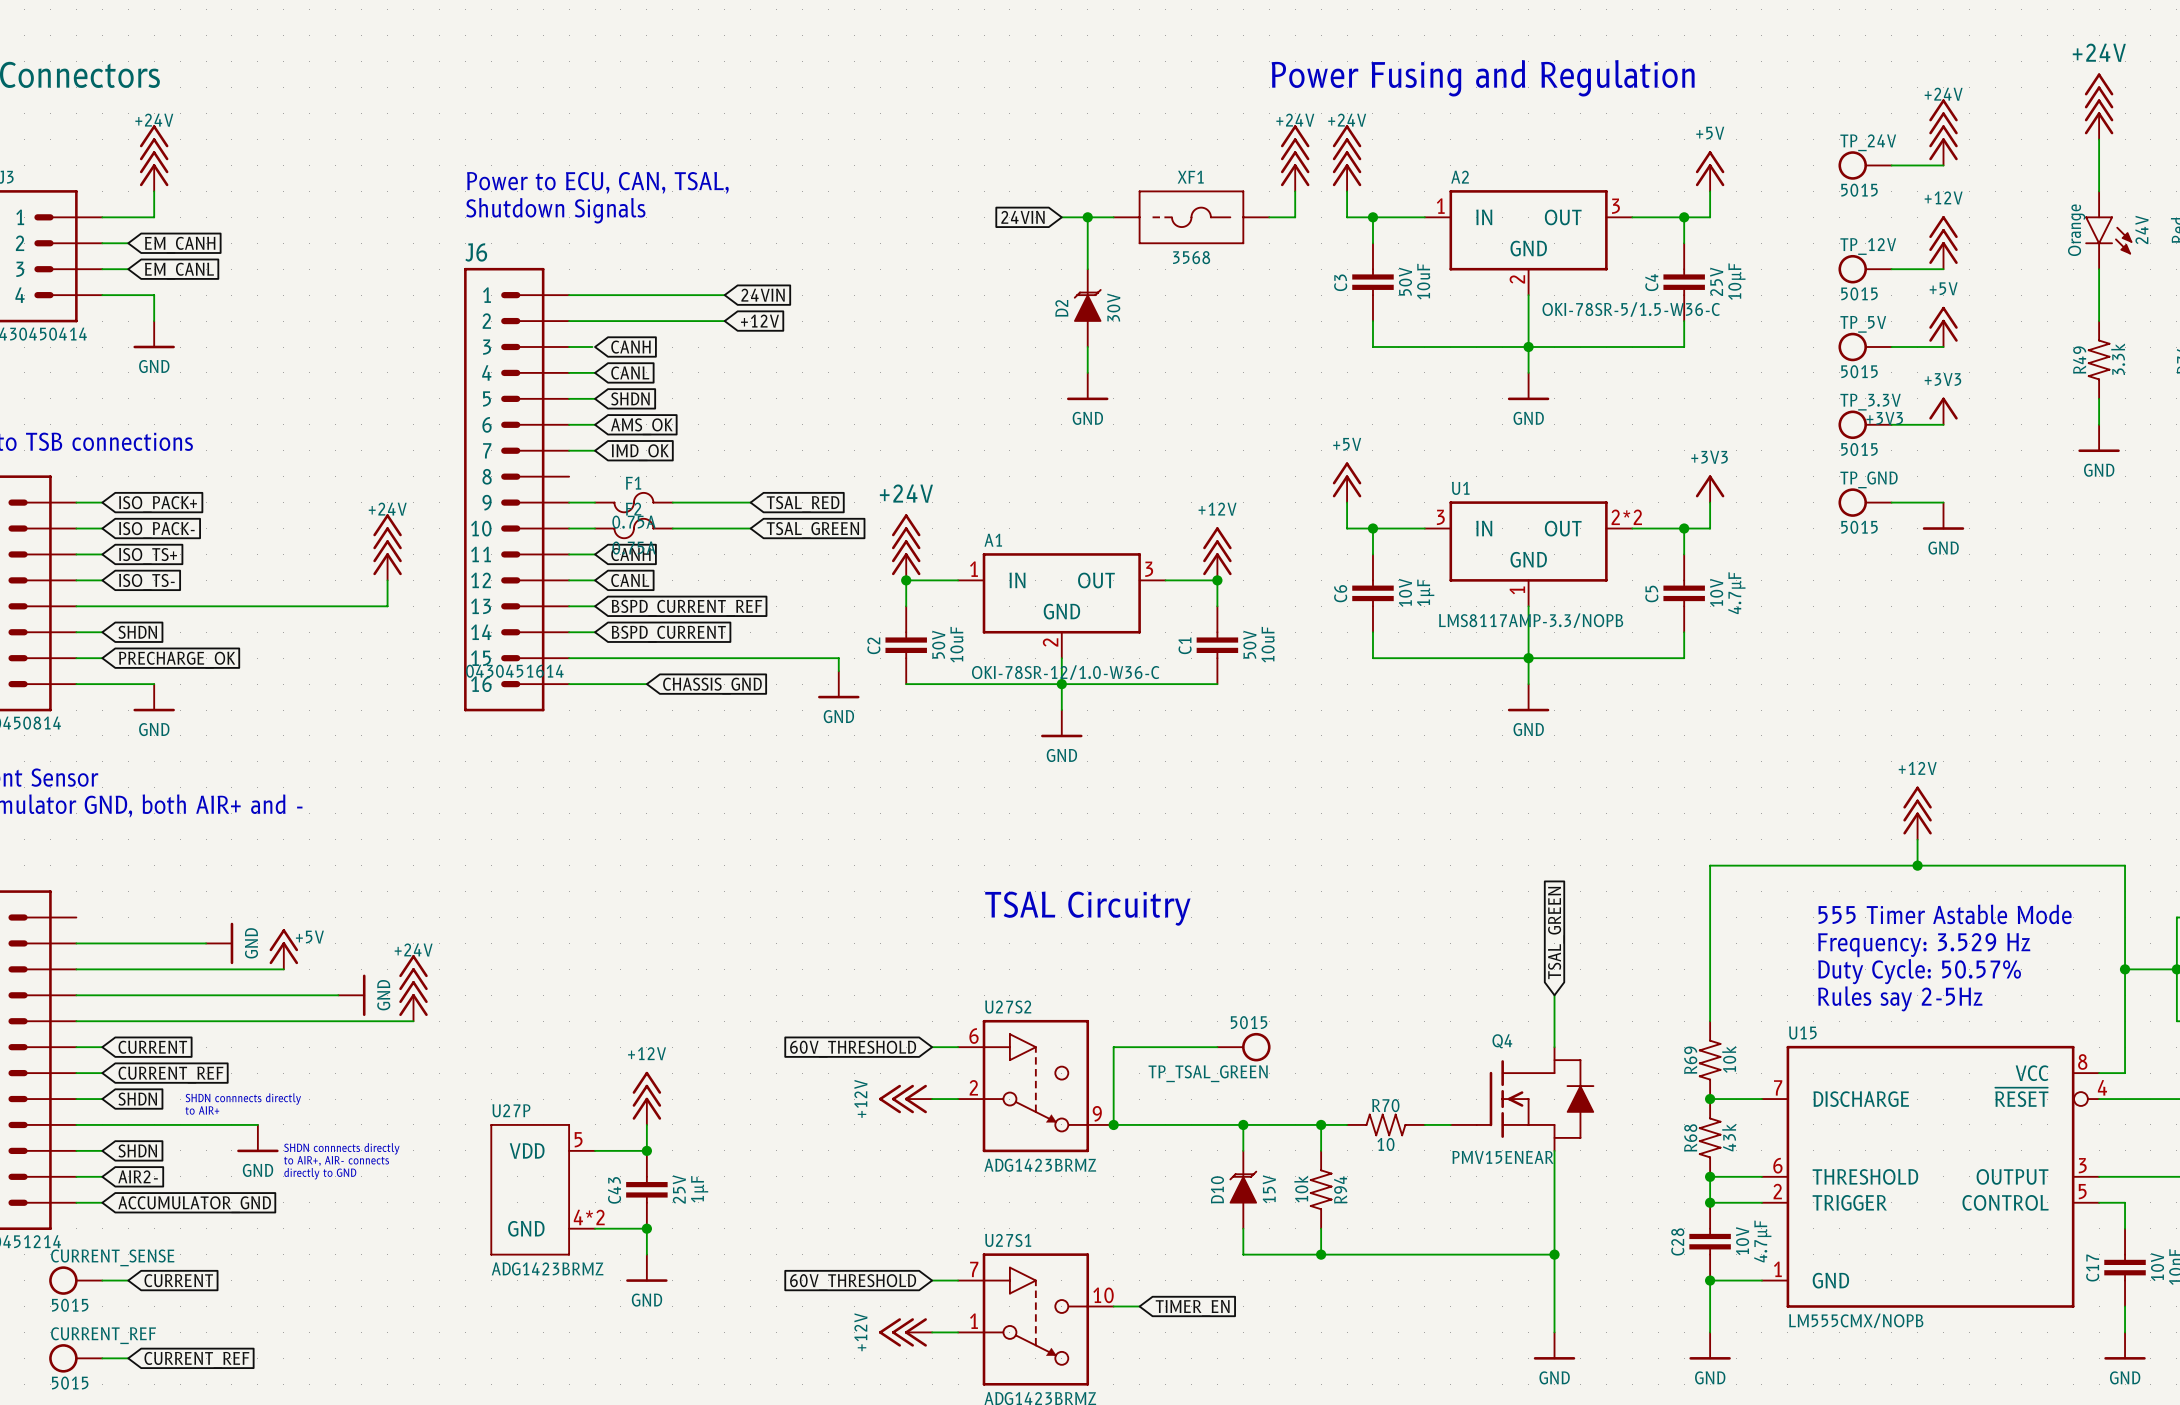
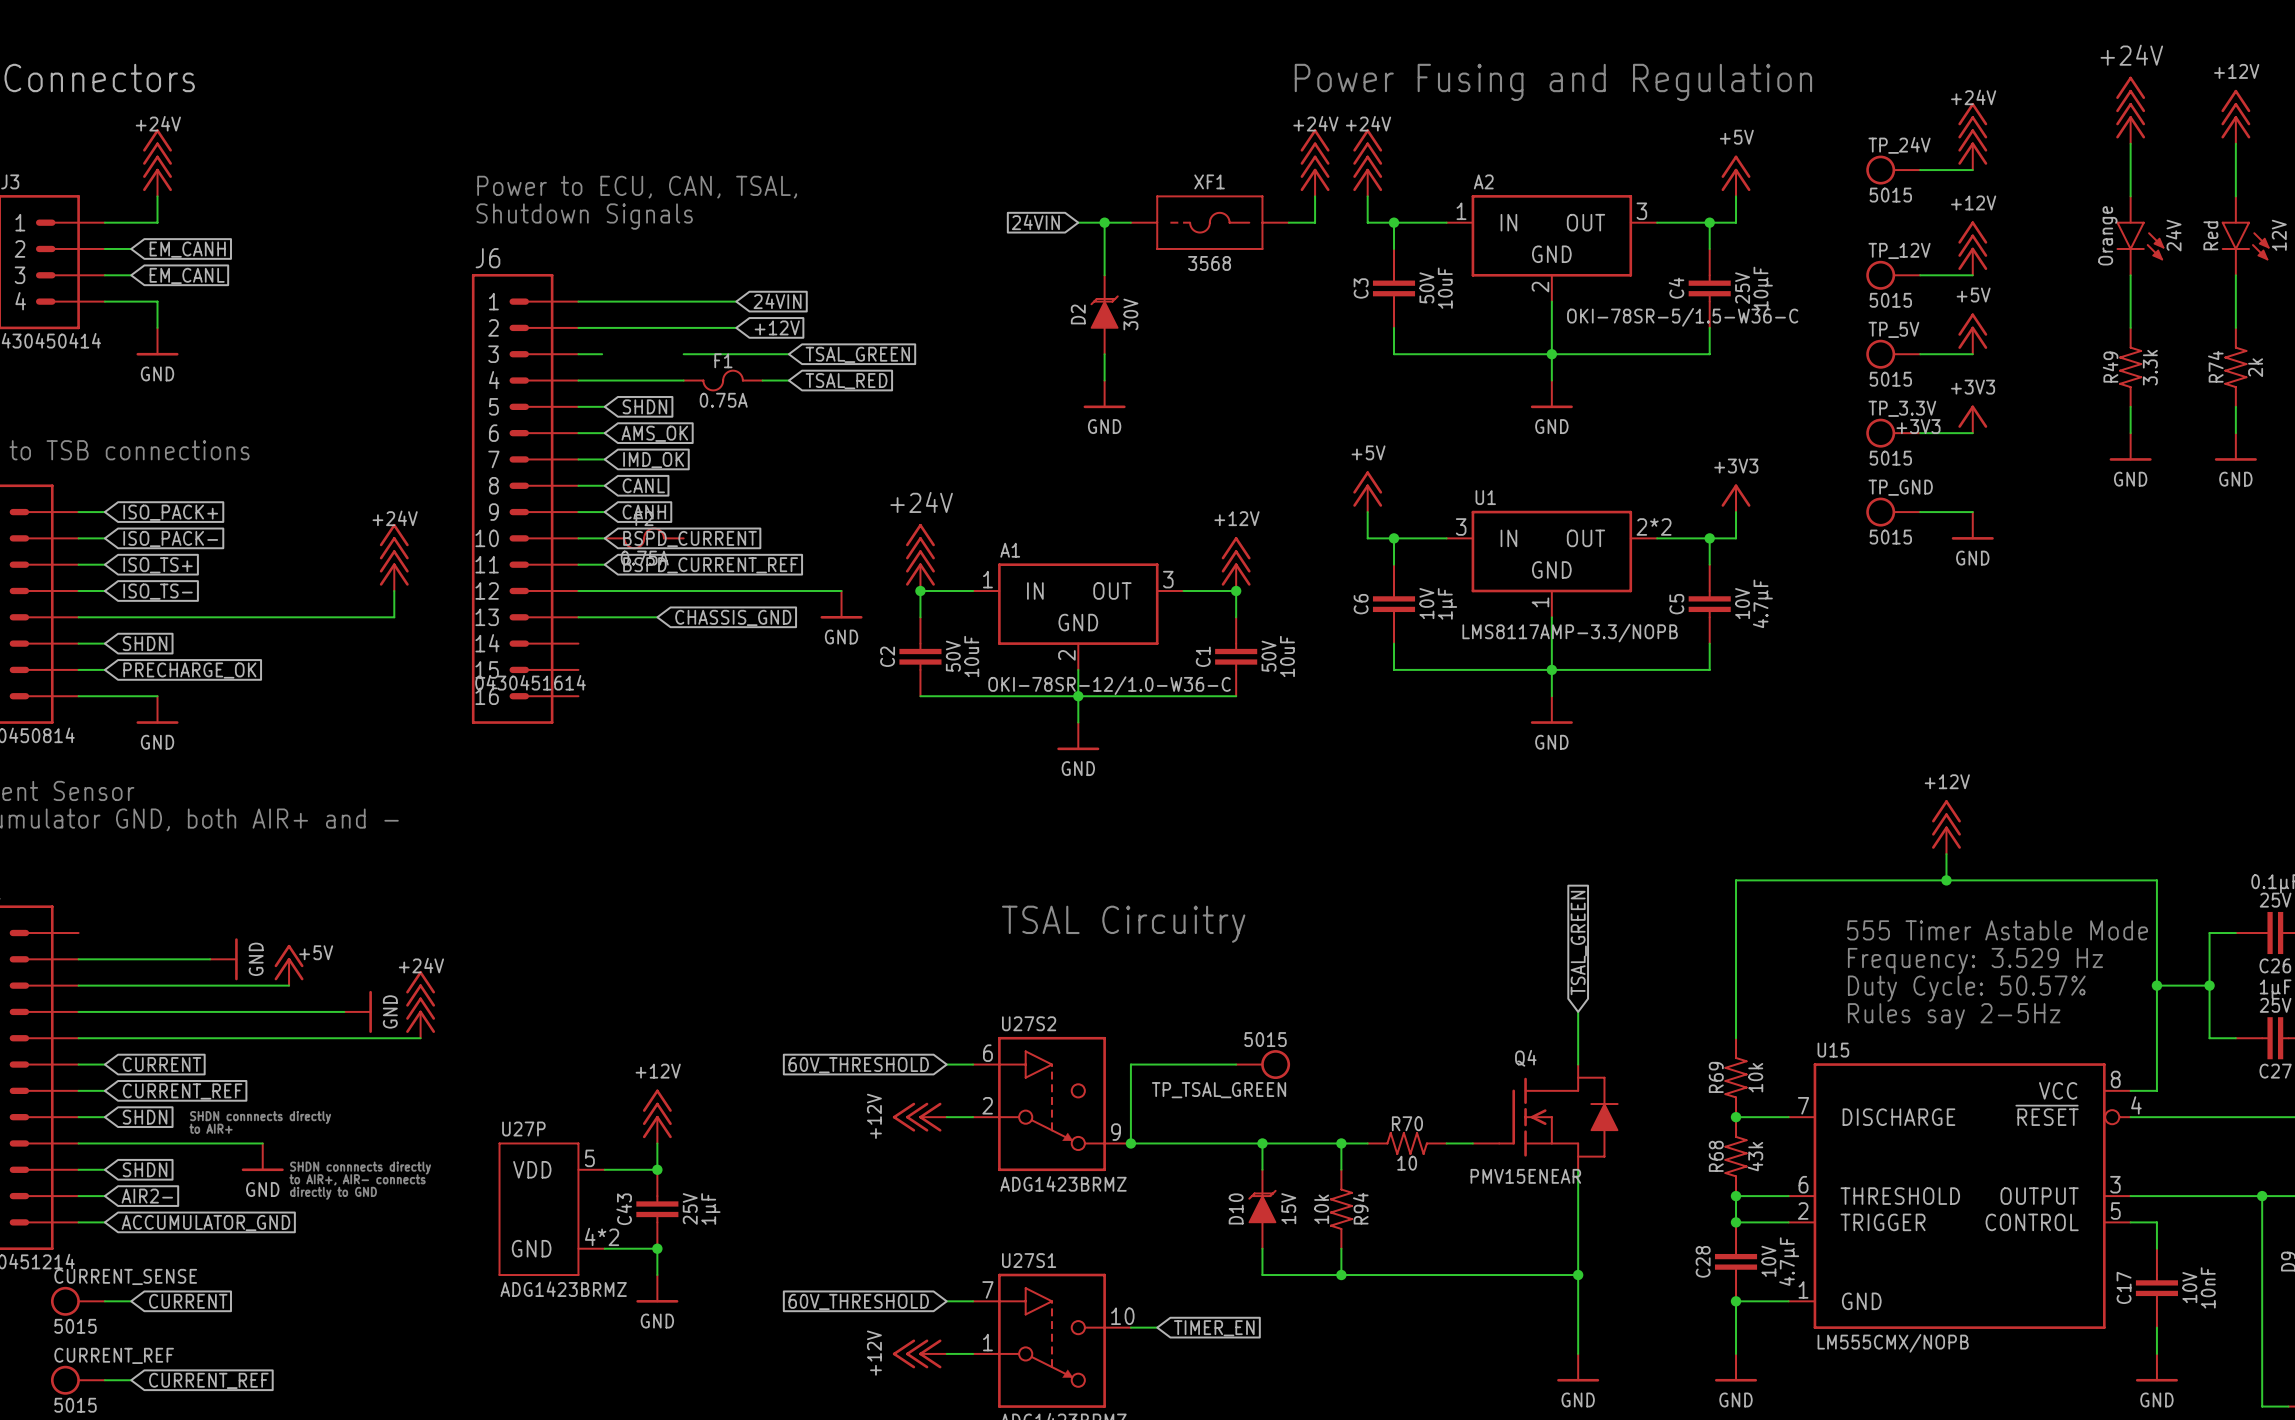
global label position: CANH (630, 347) -> CANH (644, 512)
wire: none -> (683, 354) (788, 354)
wire: none -> (762, 380) (788, 380)
global label: CANL (630, 373) -> none
global label: none -> CANL (643, 485)
F1 position: (633, 502) -> (723, 380)
wire: (672, 502) (750, 502) -> (604, 380) (683, 380)
global label position: TSAL_RED (803, 504) -> TSAL_RED (846, 381)
wire: (672, 528) (750, 528) -> none
global label position: TSAL_GREEN (812, 530) -> TSAL_GREEN (857, 354)
global label: CANH (630, 554) -> BSPD_CURRENT_REF (710, 565)
wire: none -> (604, 591) (841, 591)
global label: CANL (630, 580) -> none
wire: none -> (604, 617) (657, 617)
global label: BSPD_CURRENT_REF (686, 608) -> none
wire: (569, 632) (595, 632) -> (578, 485) (604, 485)
global label position: BSPD_CURRENT (668, 634) -> BSPD_CURRENT (690, 539)
wire: (569, 658) (838, 658) (838, 671) -> none
wire: (569, 684) (646, 684) -> none
power symbol position: GND (838, 684) -> GND (841, 604)
global label position: CHASSIS_GND (712, 686) -> CHASSIS_GND (733, 617)

